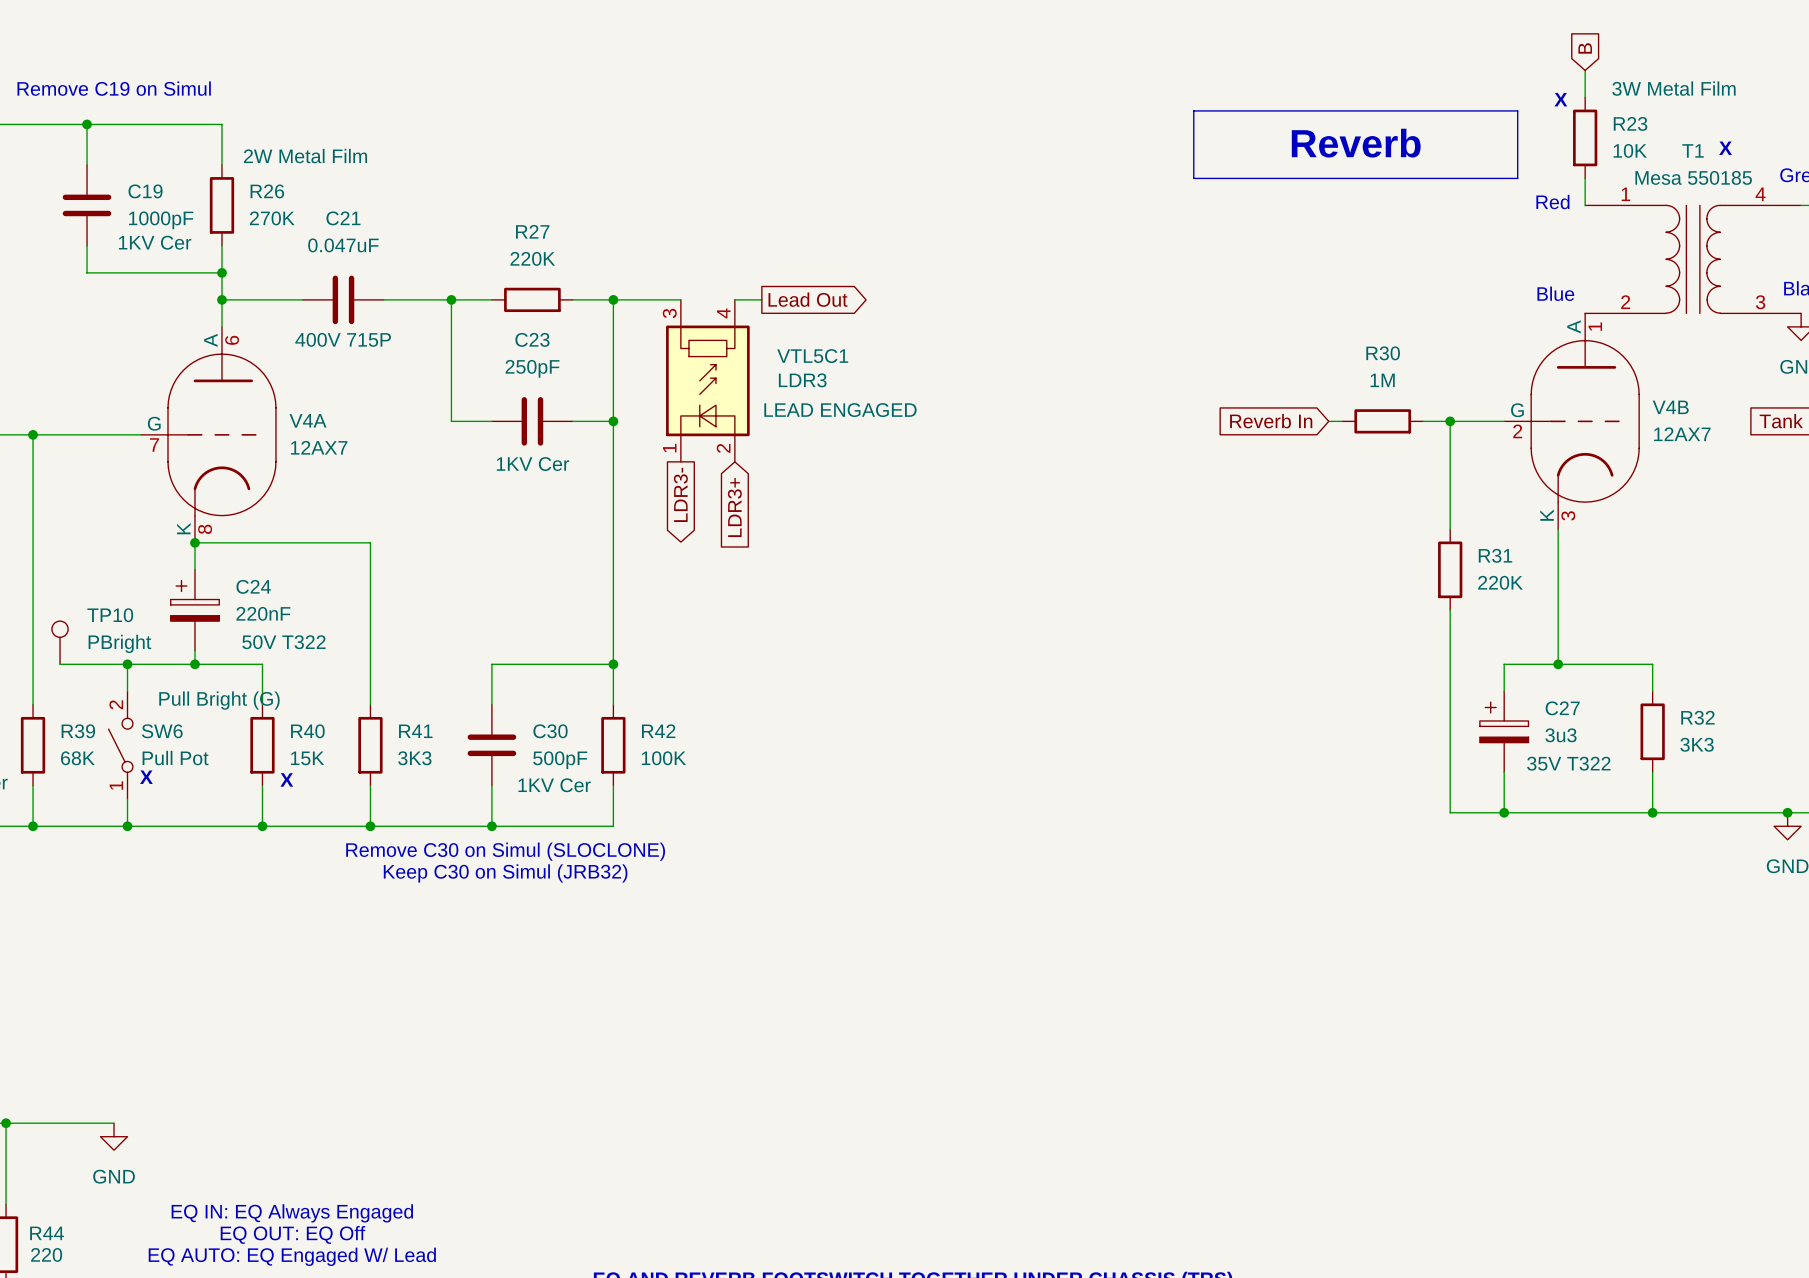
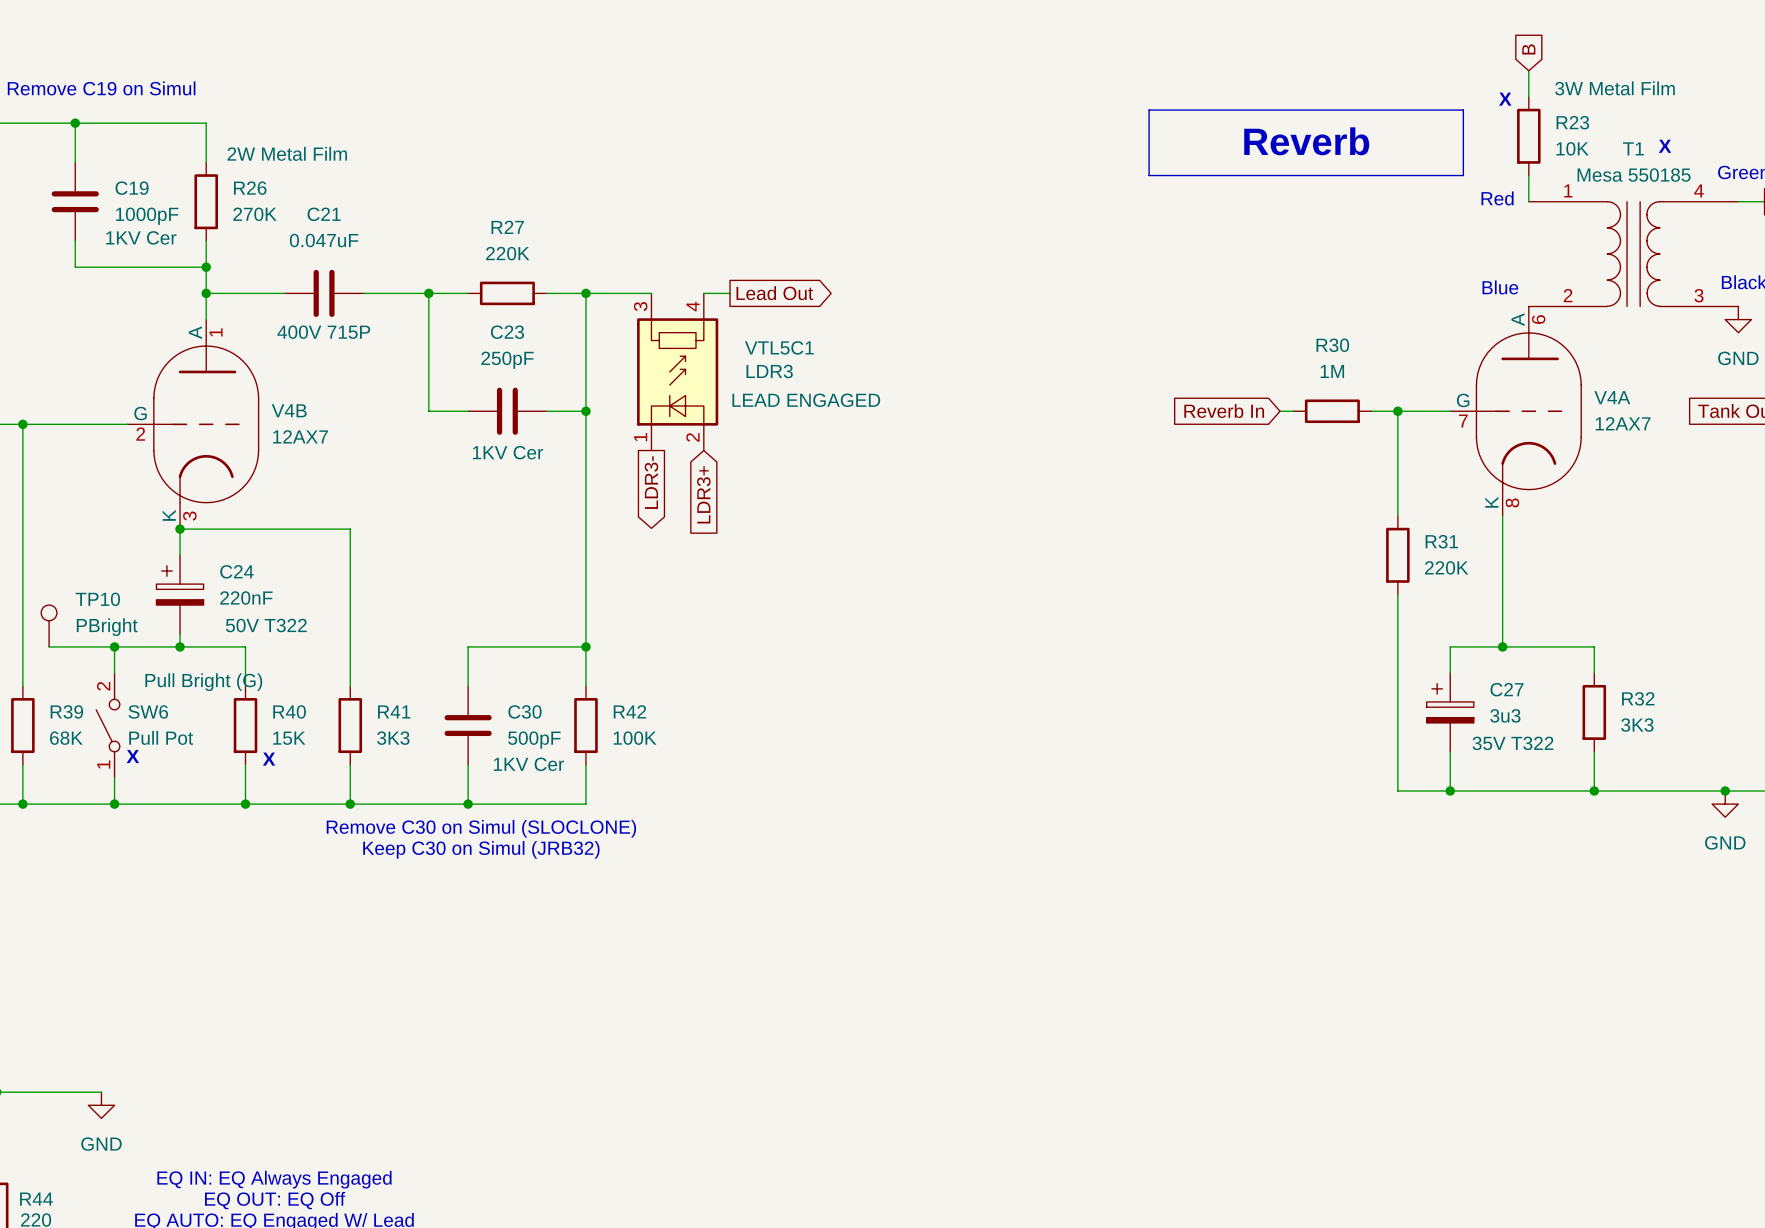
V4B position: (1571, 421) -> (193, 424)
V4A position: (208, 434) -> (1515, 411)

